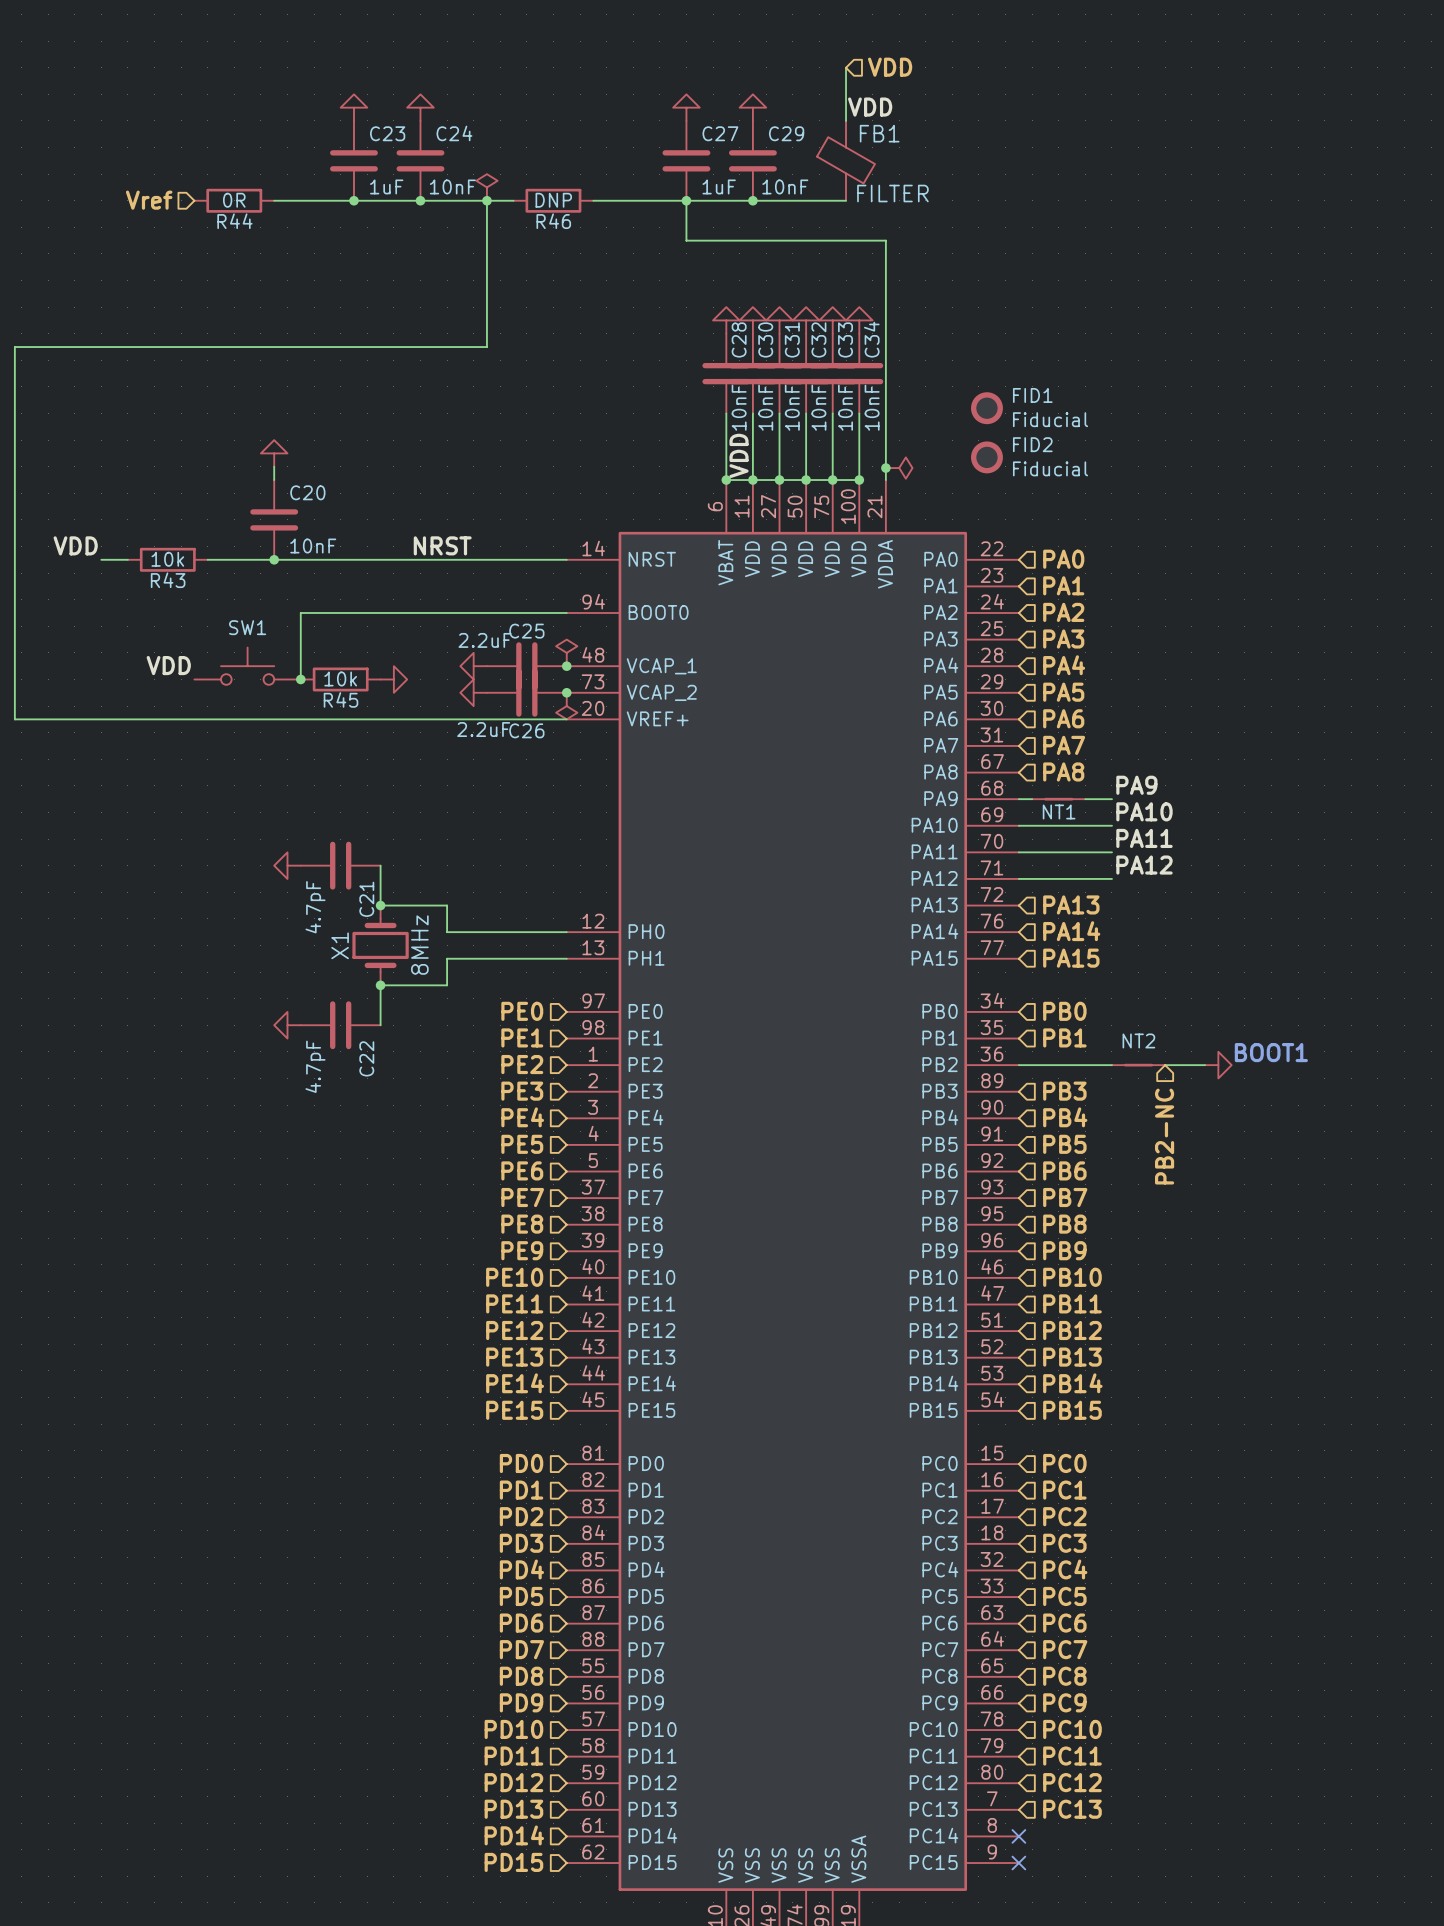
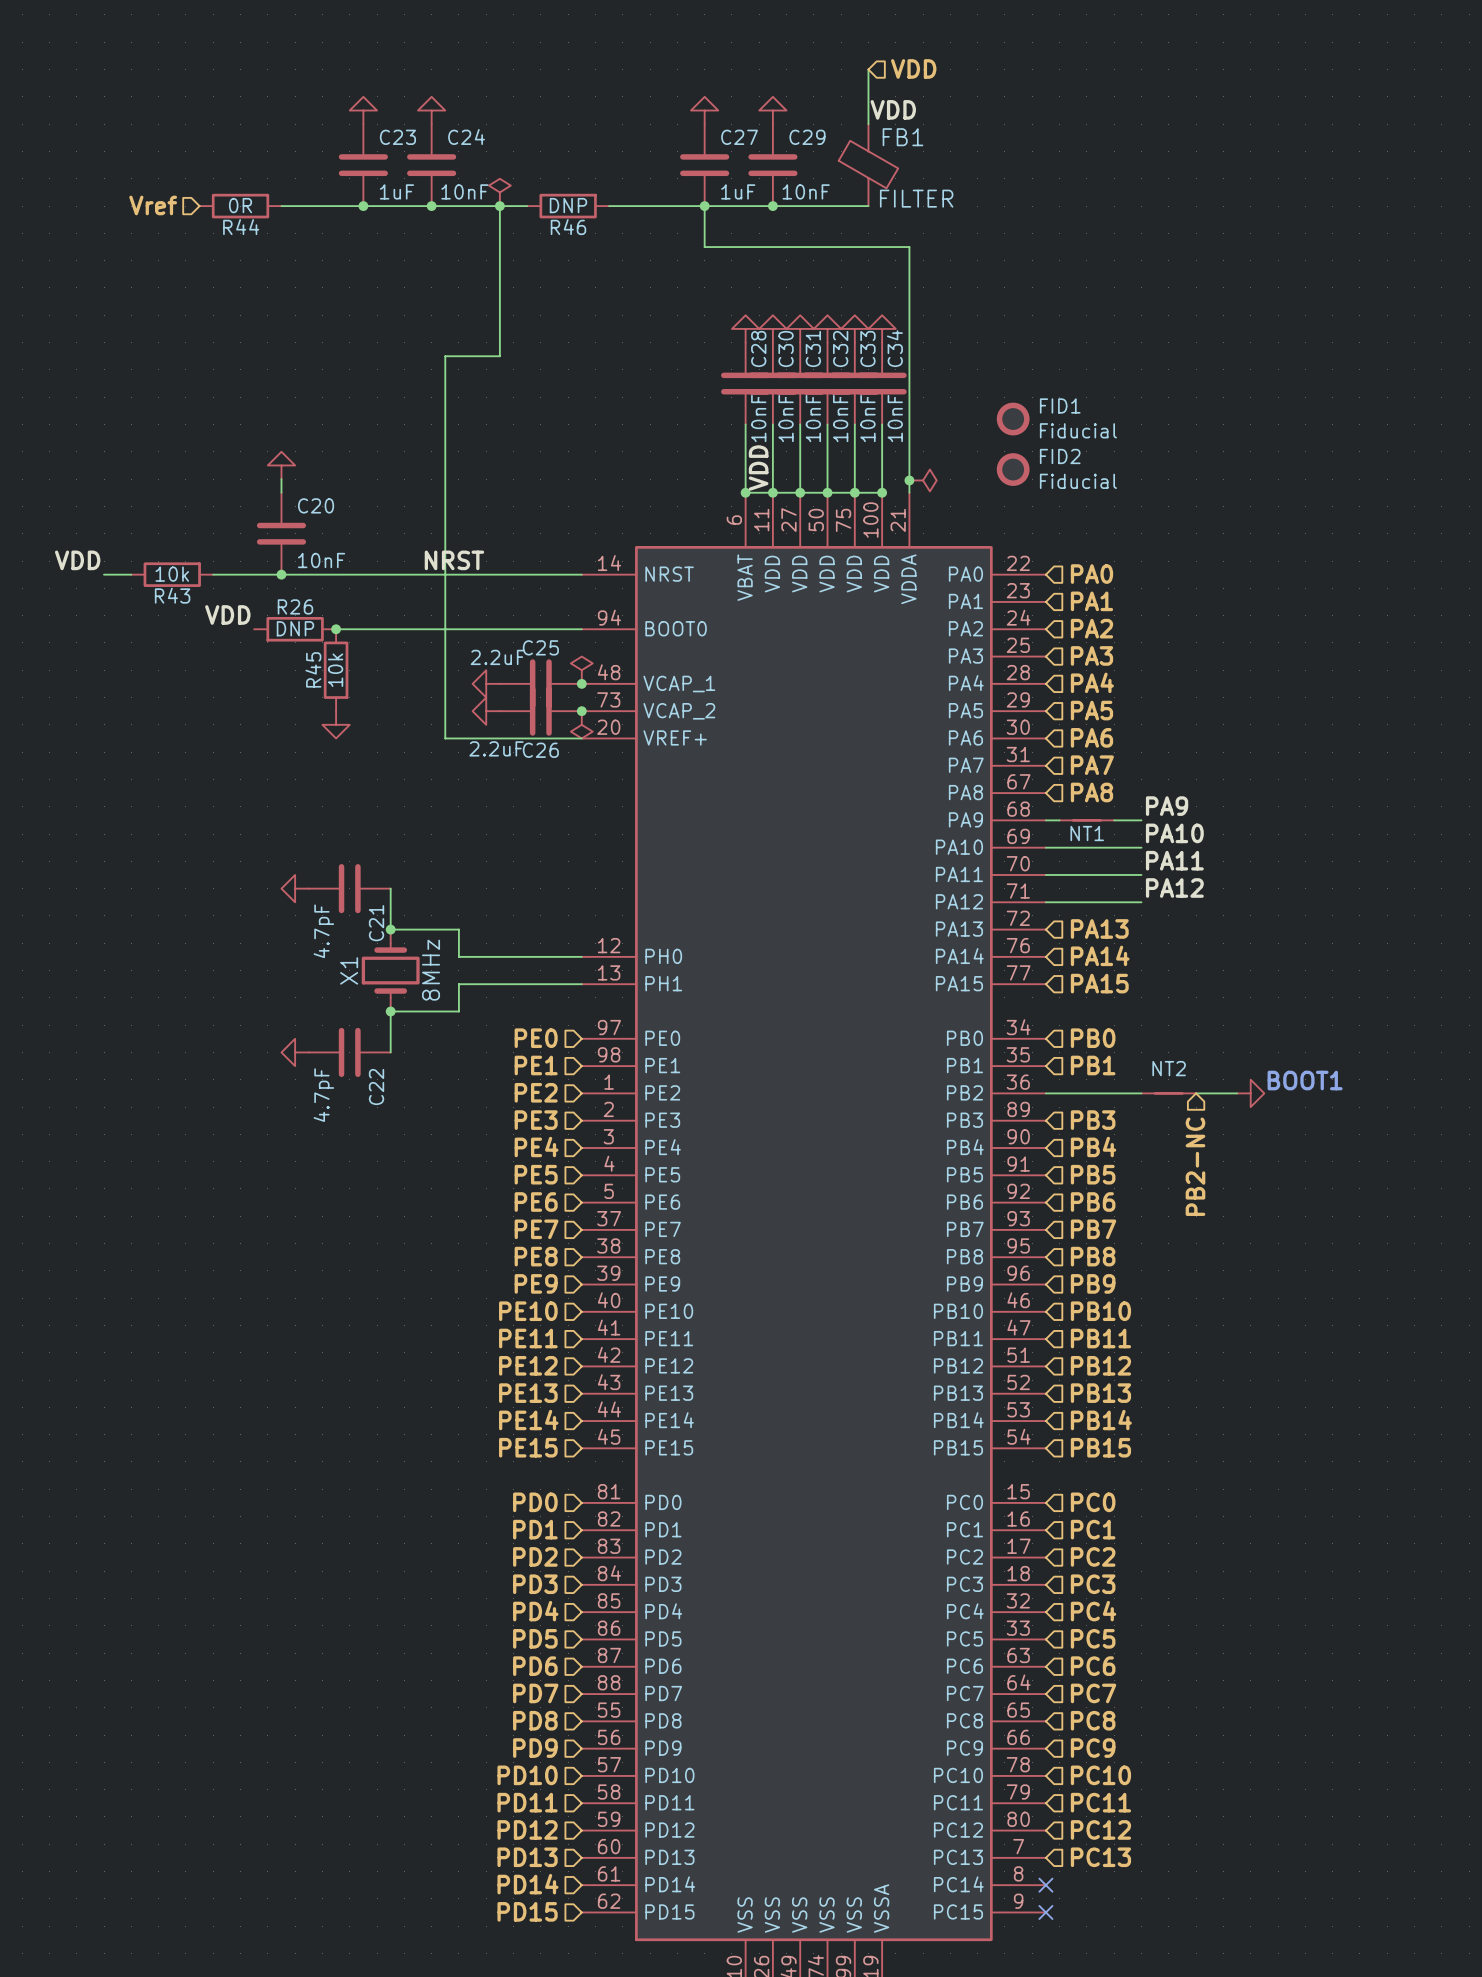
wire: (433, 347) (14, 347) (14, 719) (433, 719) -> (445, 356) (445, 738)
R26: none -> DNP (295, 629)
wire: (327, 612) (300, 612) (300, 679) -> none
junction: none -> (336, 629)
label position: VDD (168, 665) -> VDD (227, 614)
SW1: (247, 666) -> none
junction: (300, 679) -> none
R45 rotation: 0° (340, 679) -> 90° clockwise (336, 670)
power symbol rotation: 0° (393, 679) -> 90° clockwise (336, 724)
power symbol position: (393, 679) -> (336, 724)

